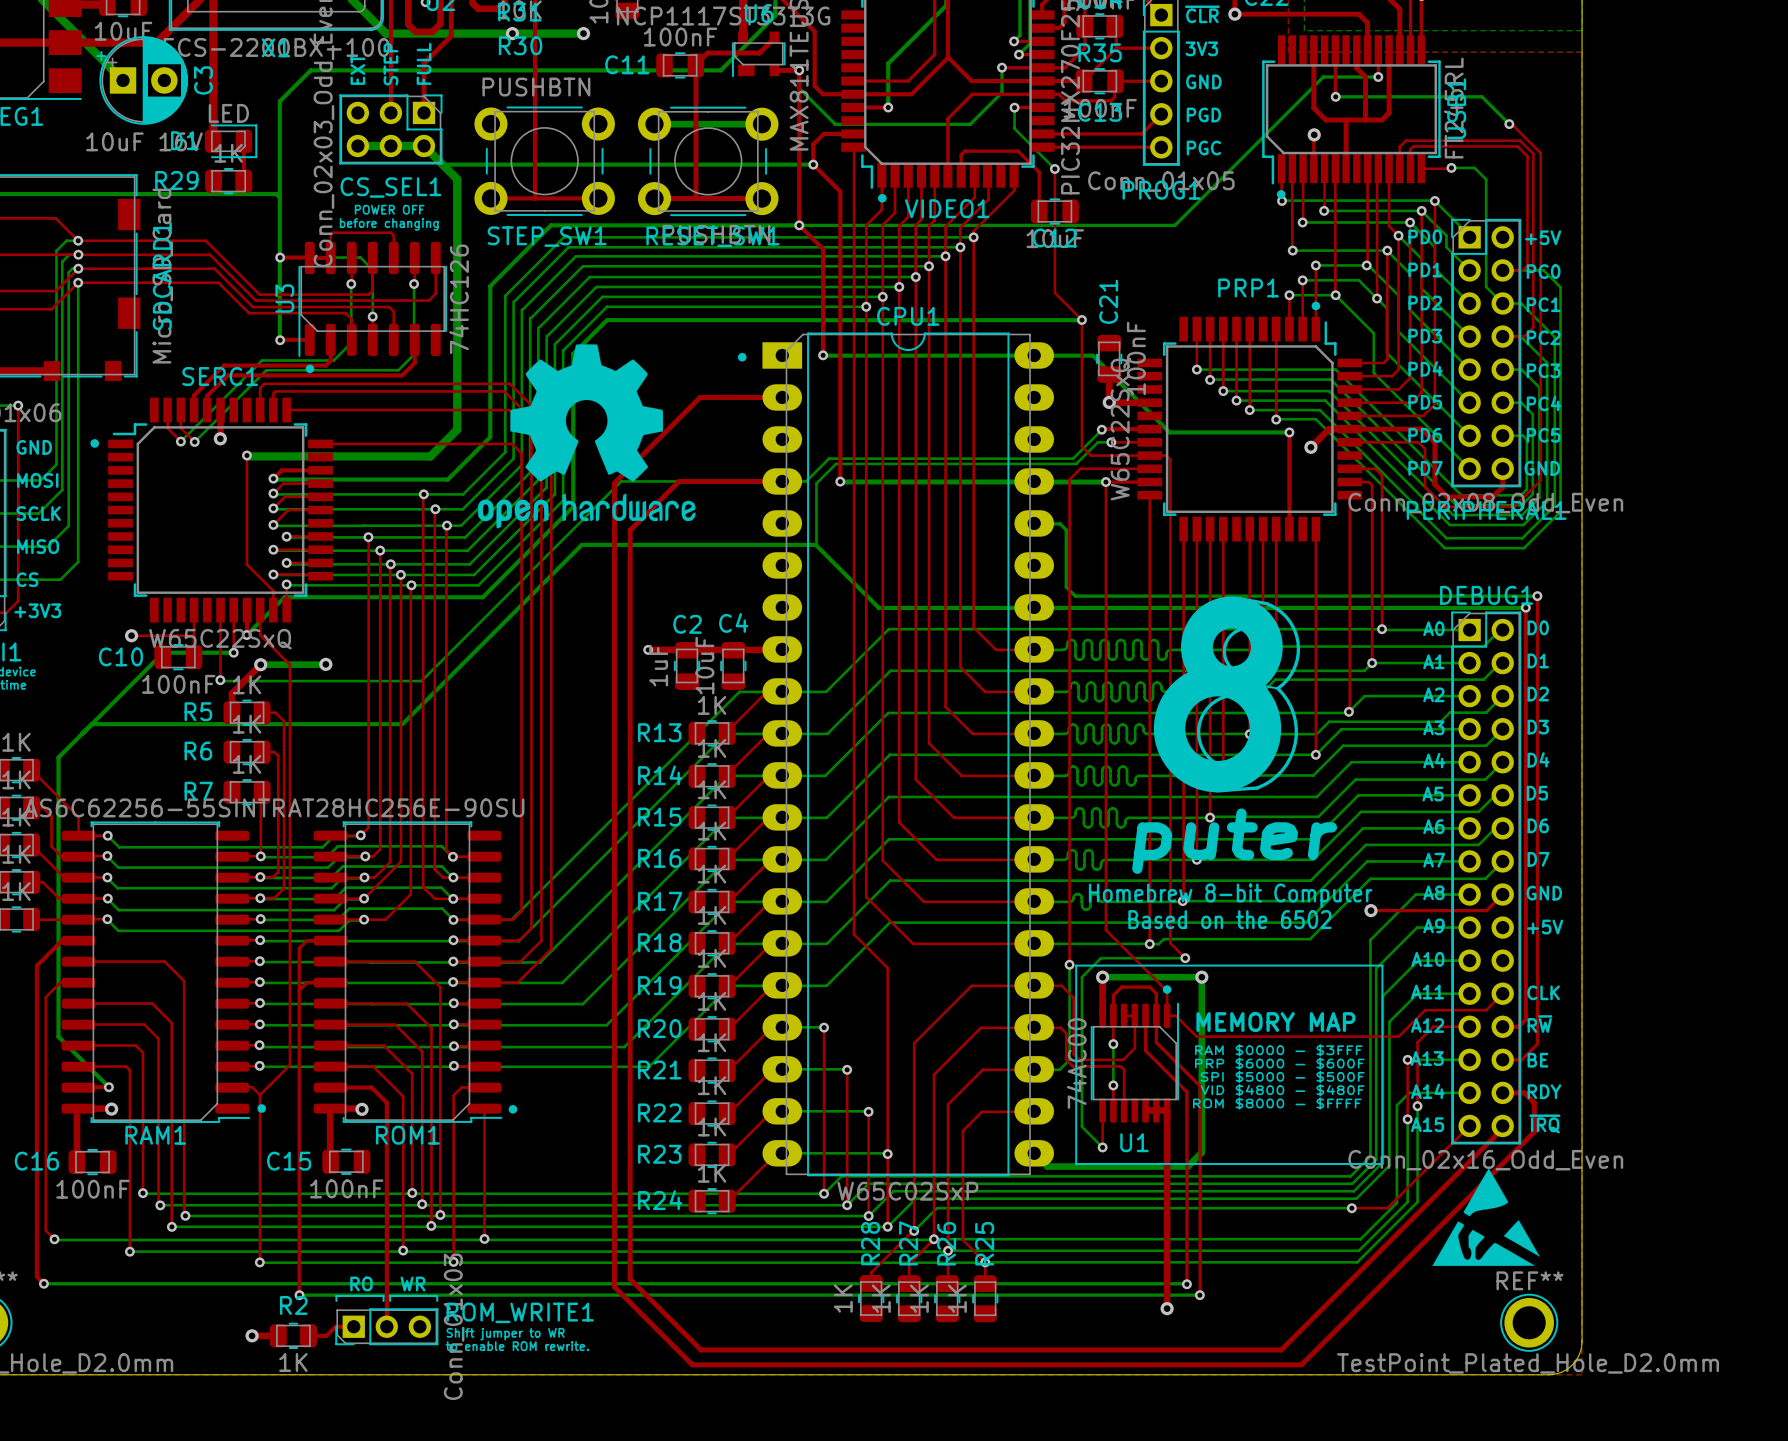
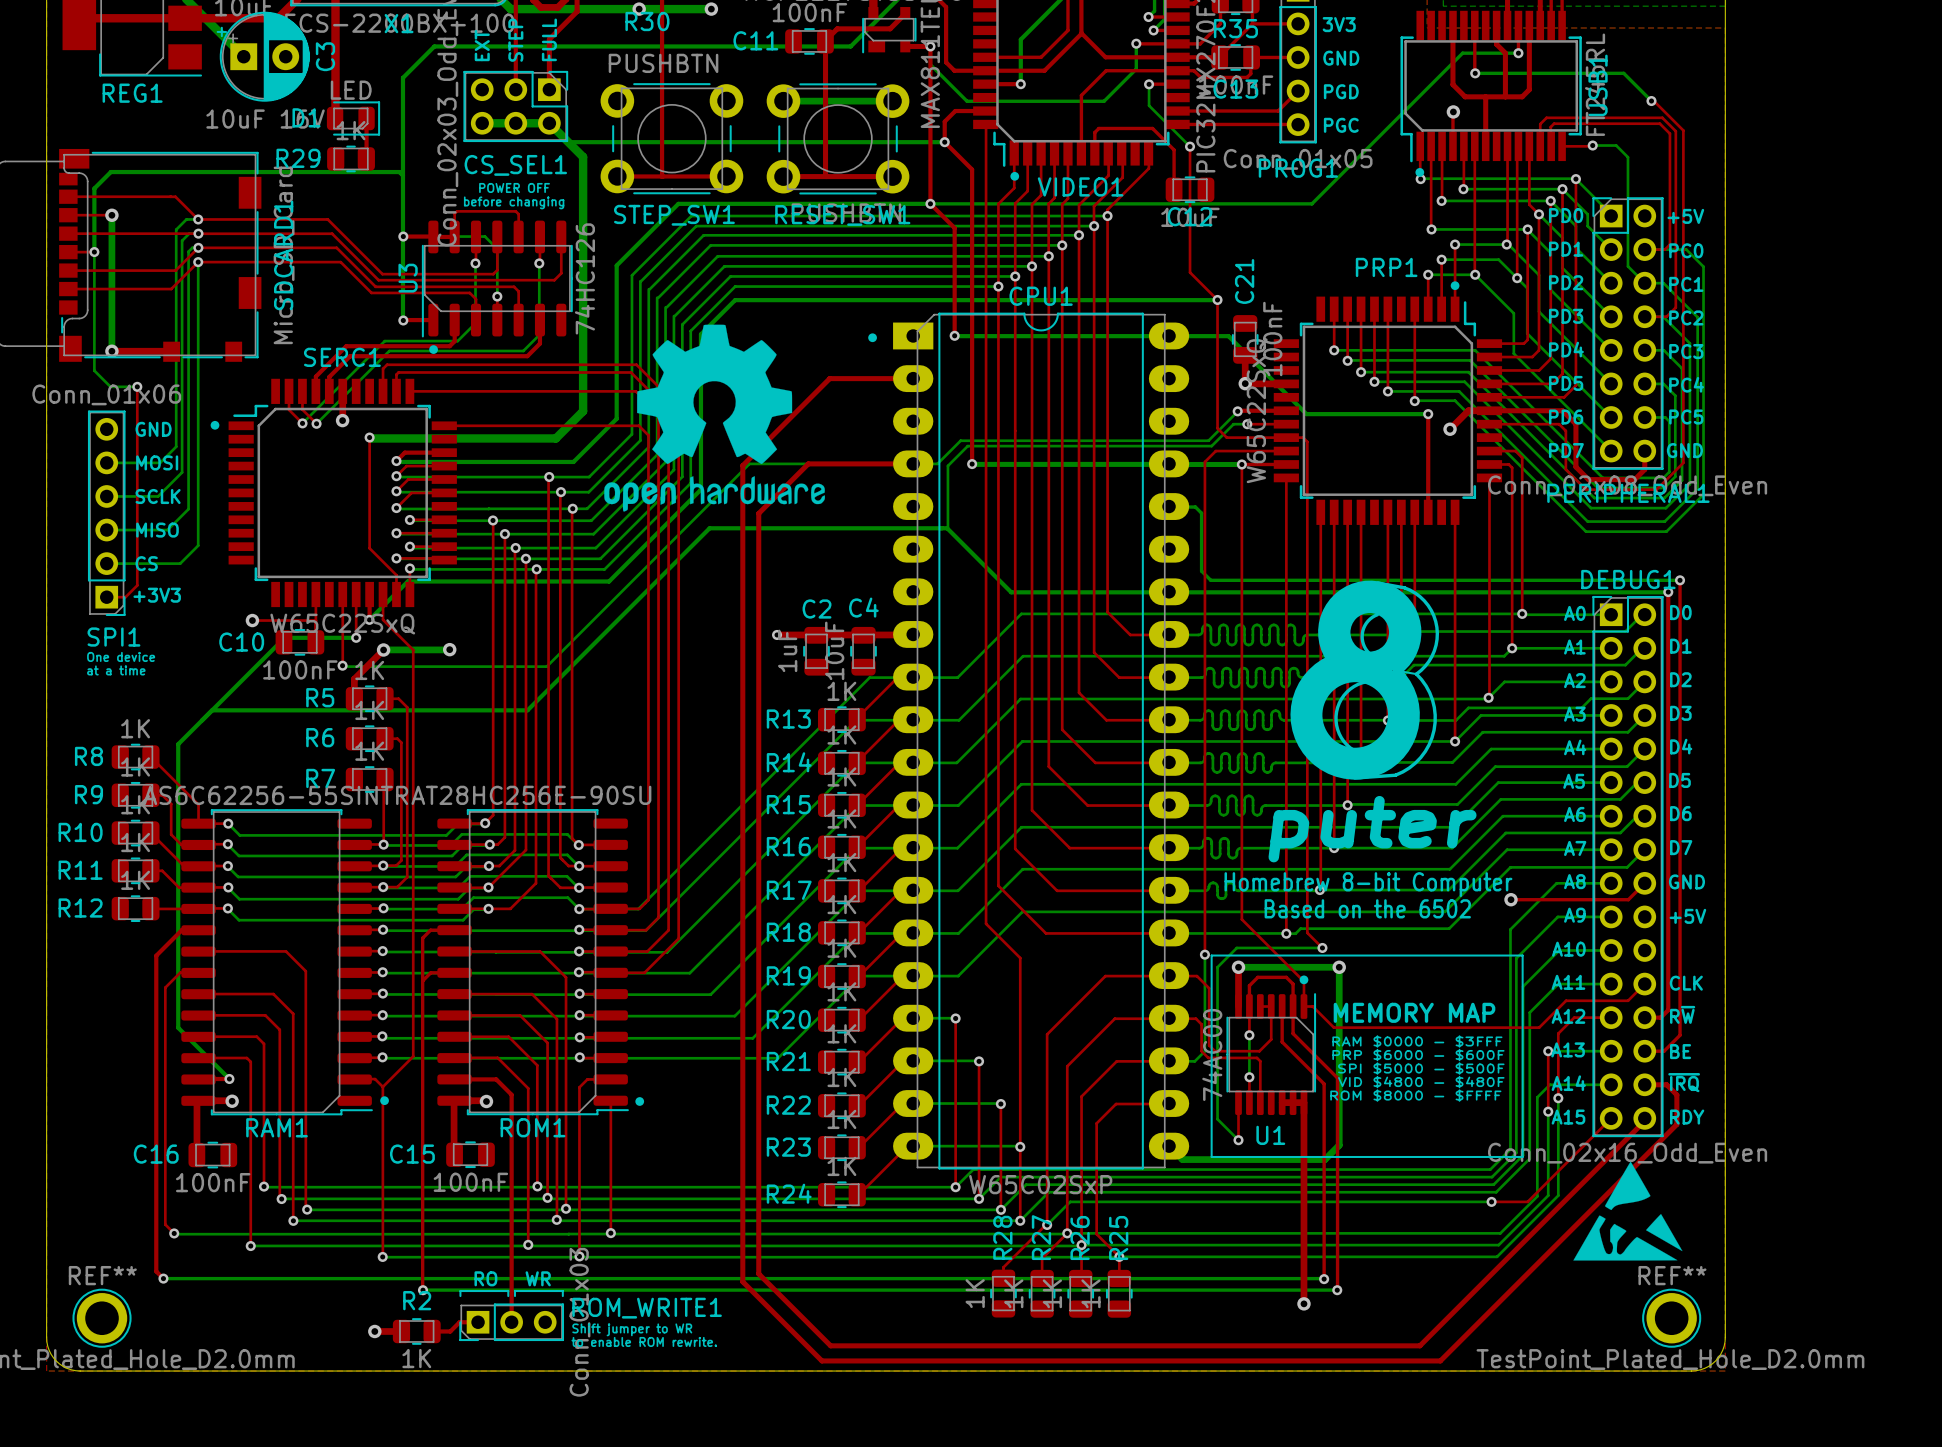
text: RDY (1544, 1091) -> ~{IRQ} (1684, 1082)
text: ~{IRQ} (1544, 1123) -> RDY (1687, 1117)

